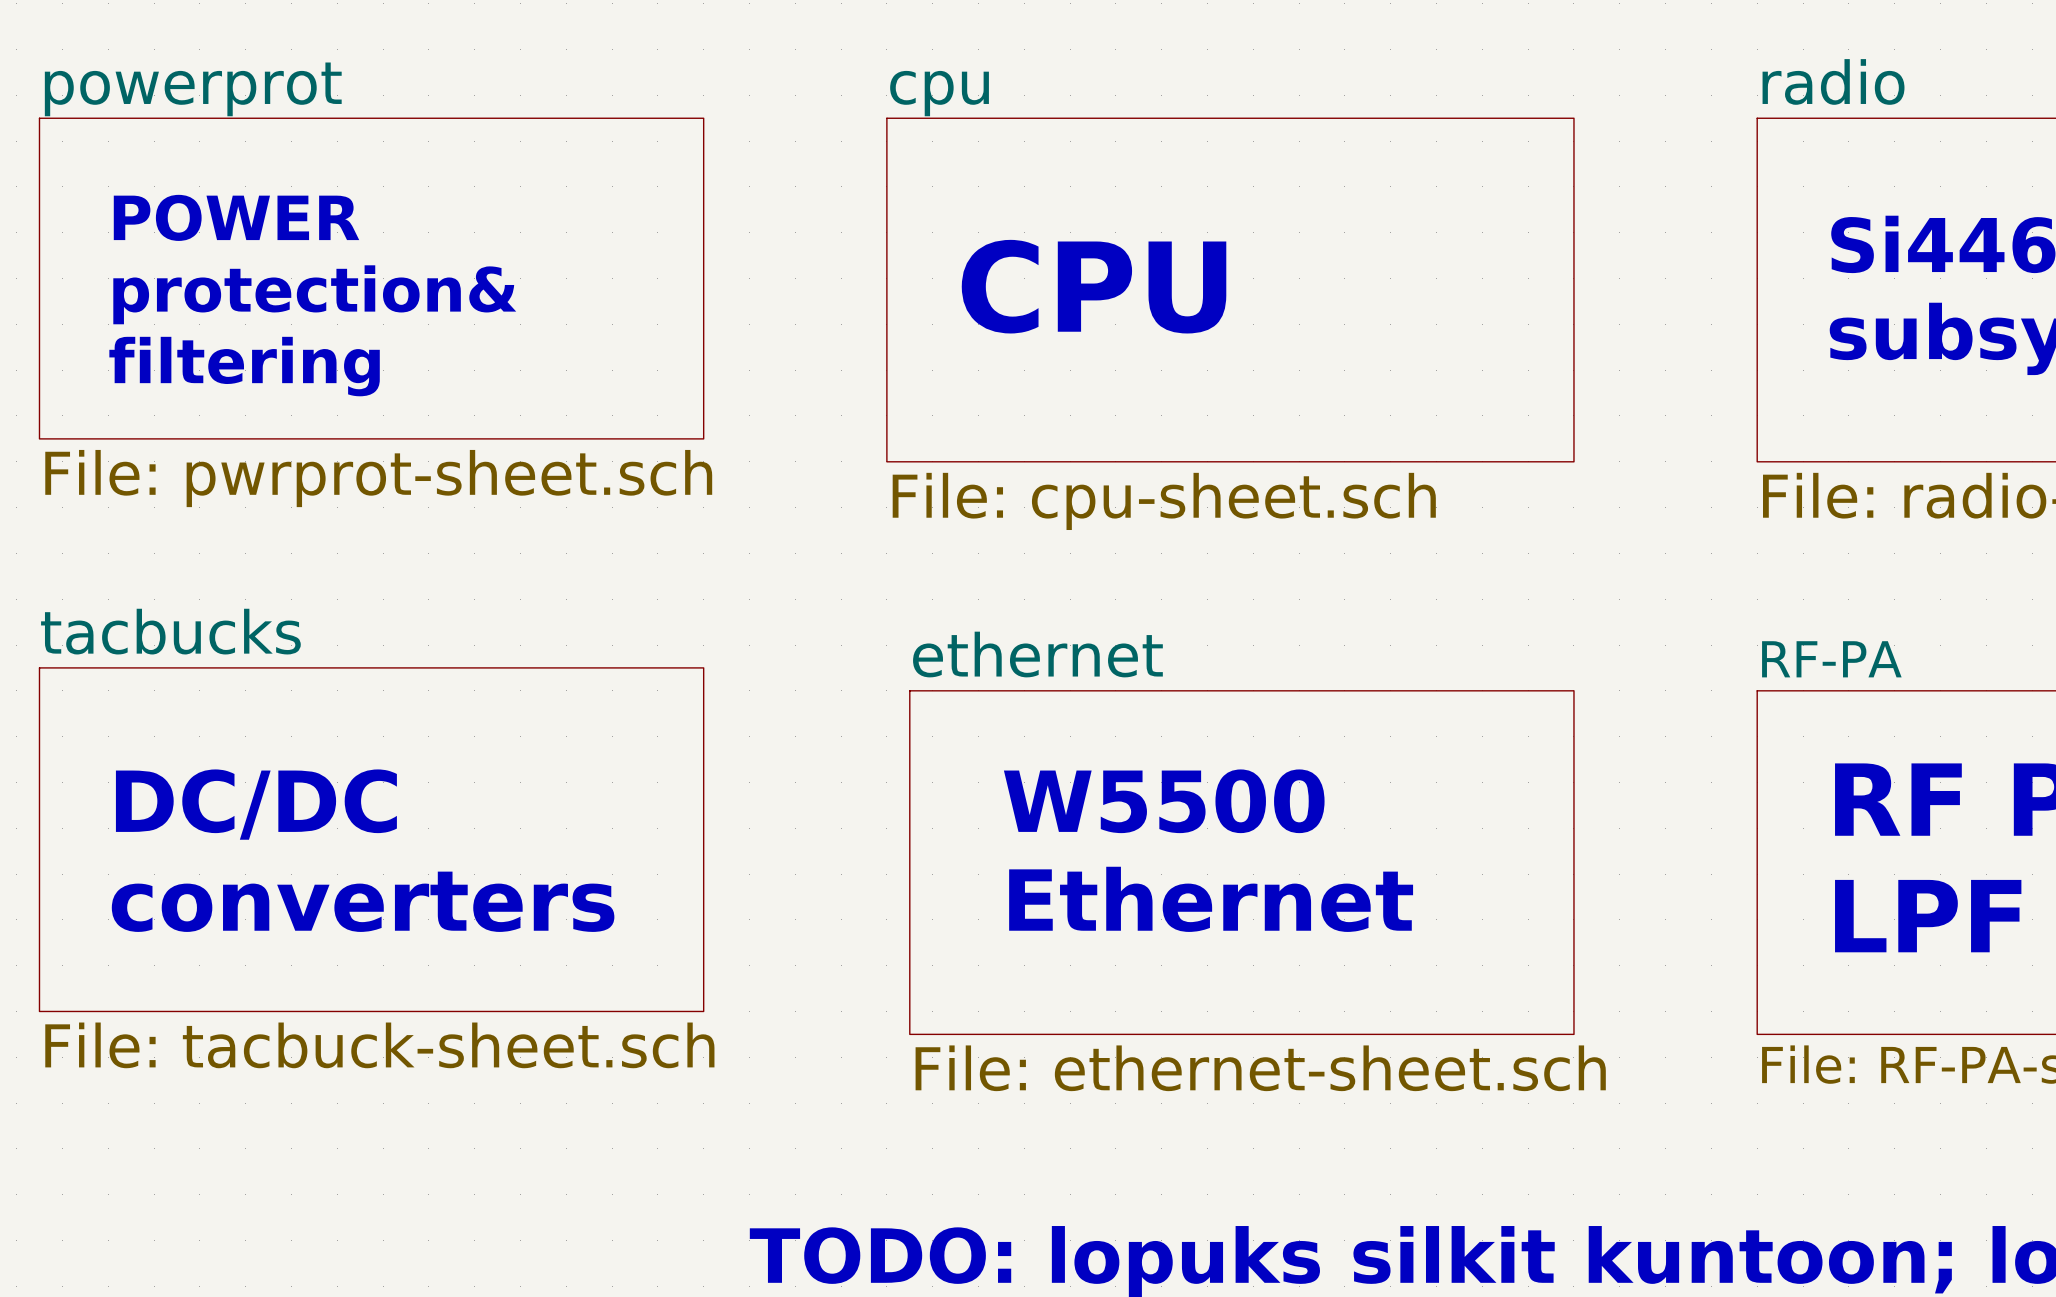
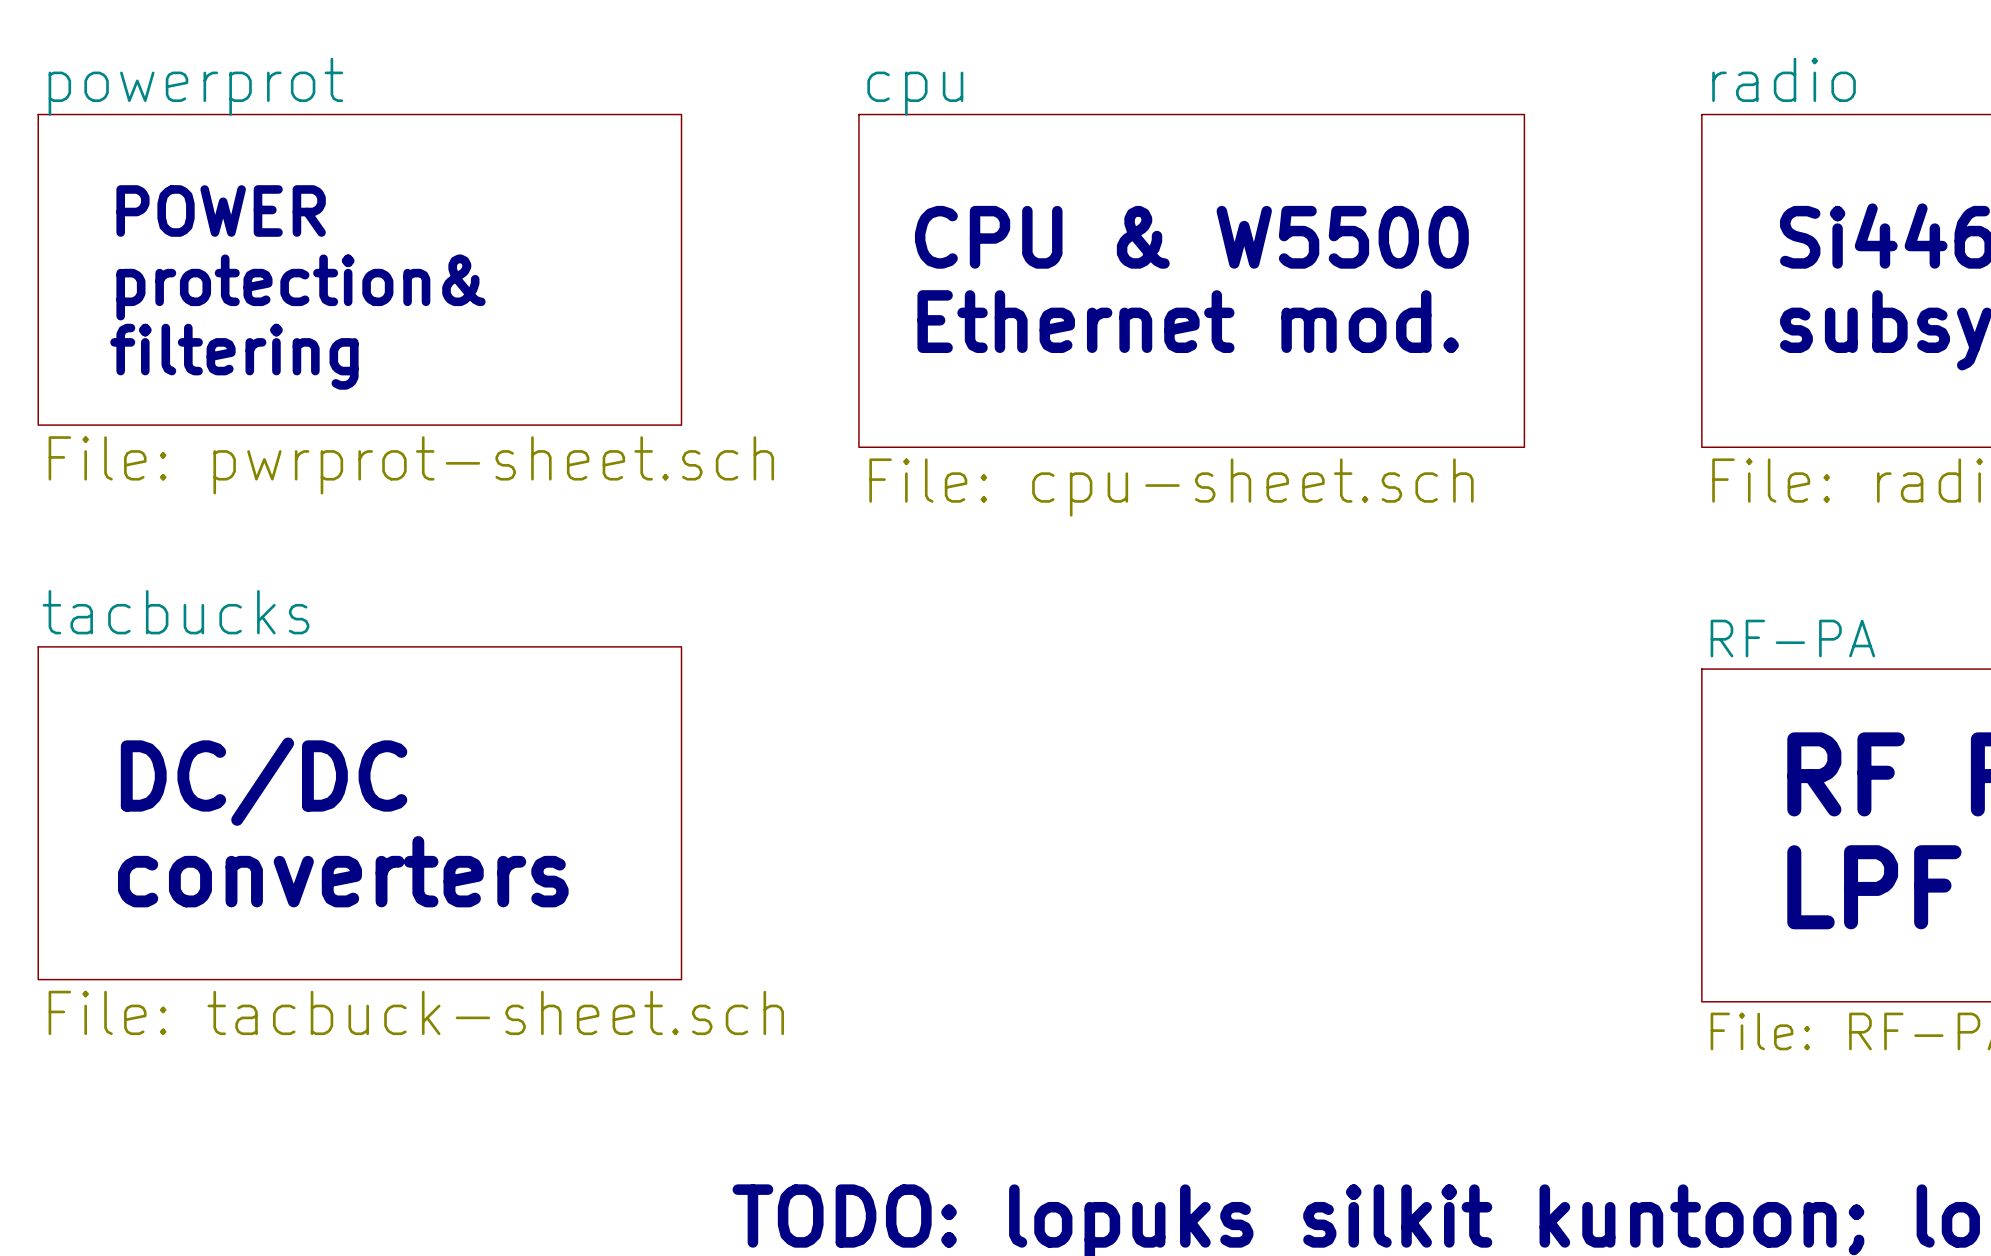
text: none -> CPU & W5500 (1191, 237)
text: CPU (1094, 286) -> none
text: none -> Ethernet mod. (1188, 321)
text: W5500 (1164, 801) -> none
sheet ethernet: File: ethernet-sheet.sch (1241, 862) -> none
text: Ethernet (1211, 899) -> none

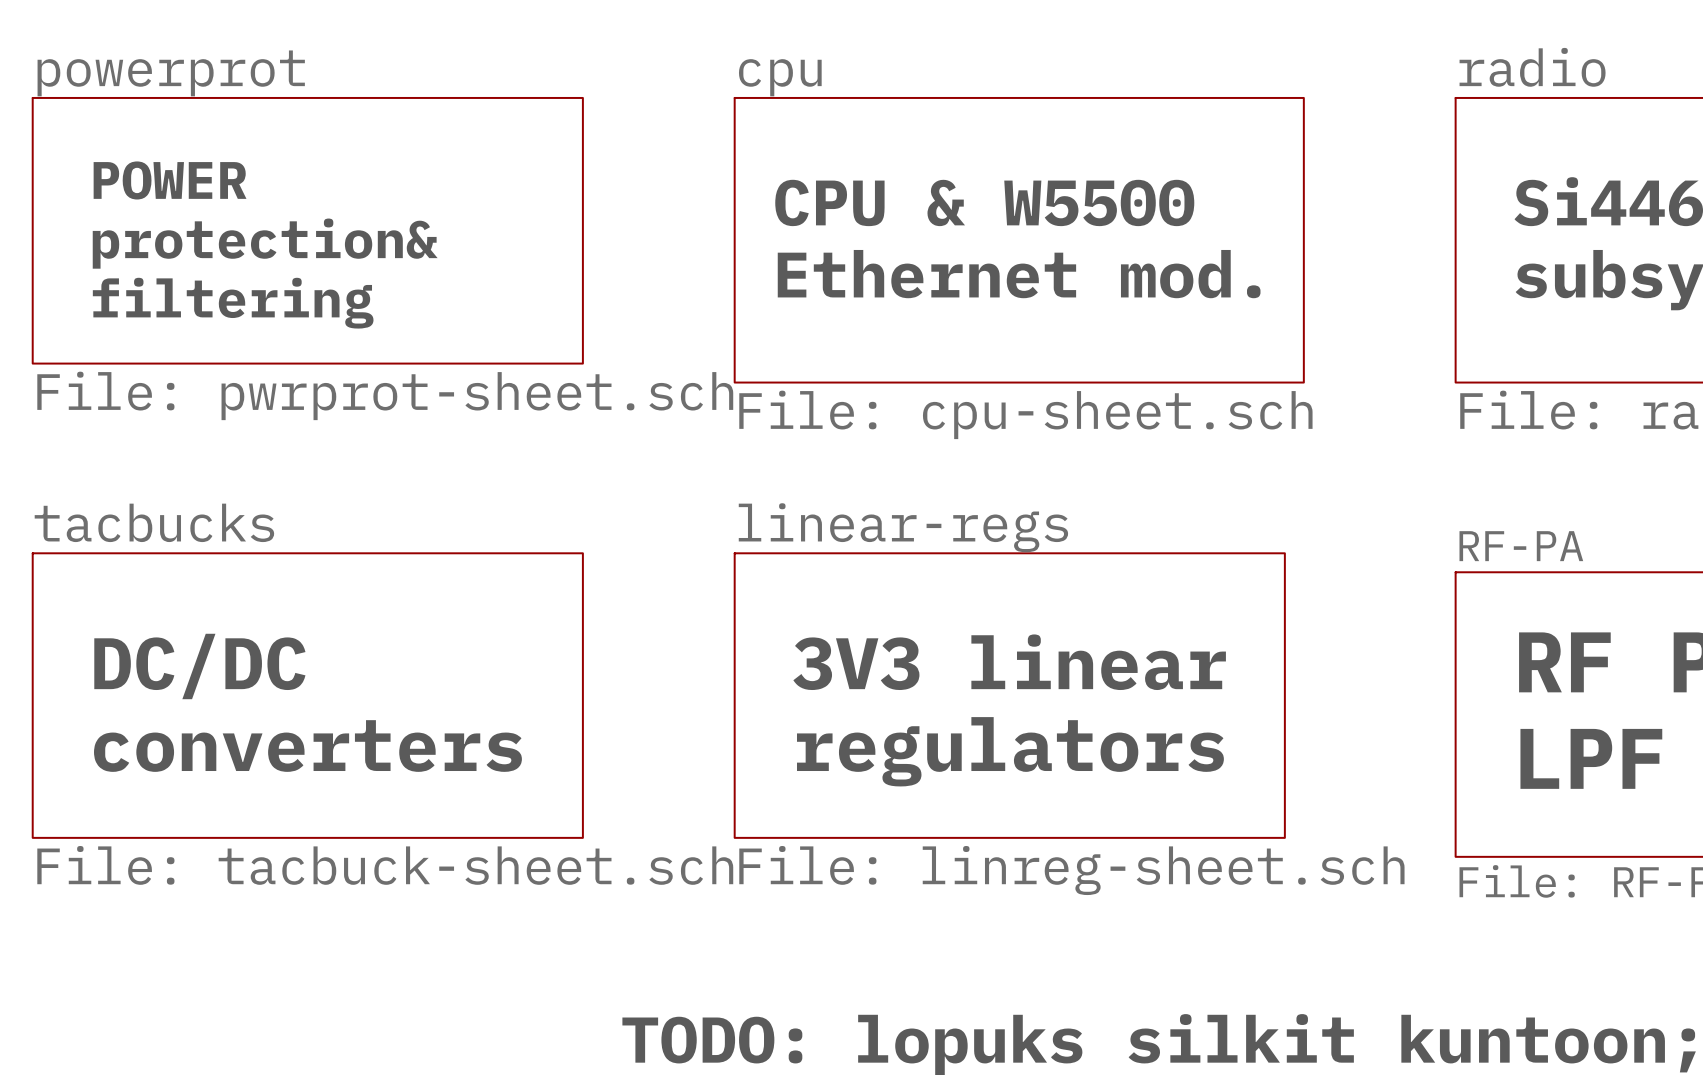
text: none -> 3V3 linear (1009, 662)
sheet linear-regs: none -> File: linreg-sheet.sch (1009, 695)
text: none -> regulators (1010, 751)

